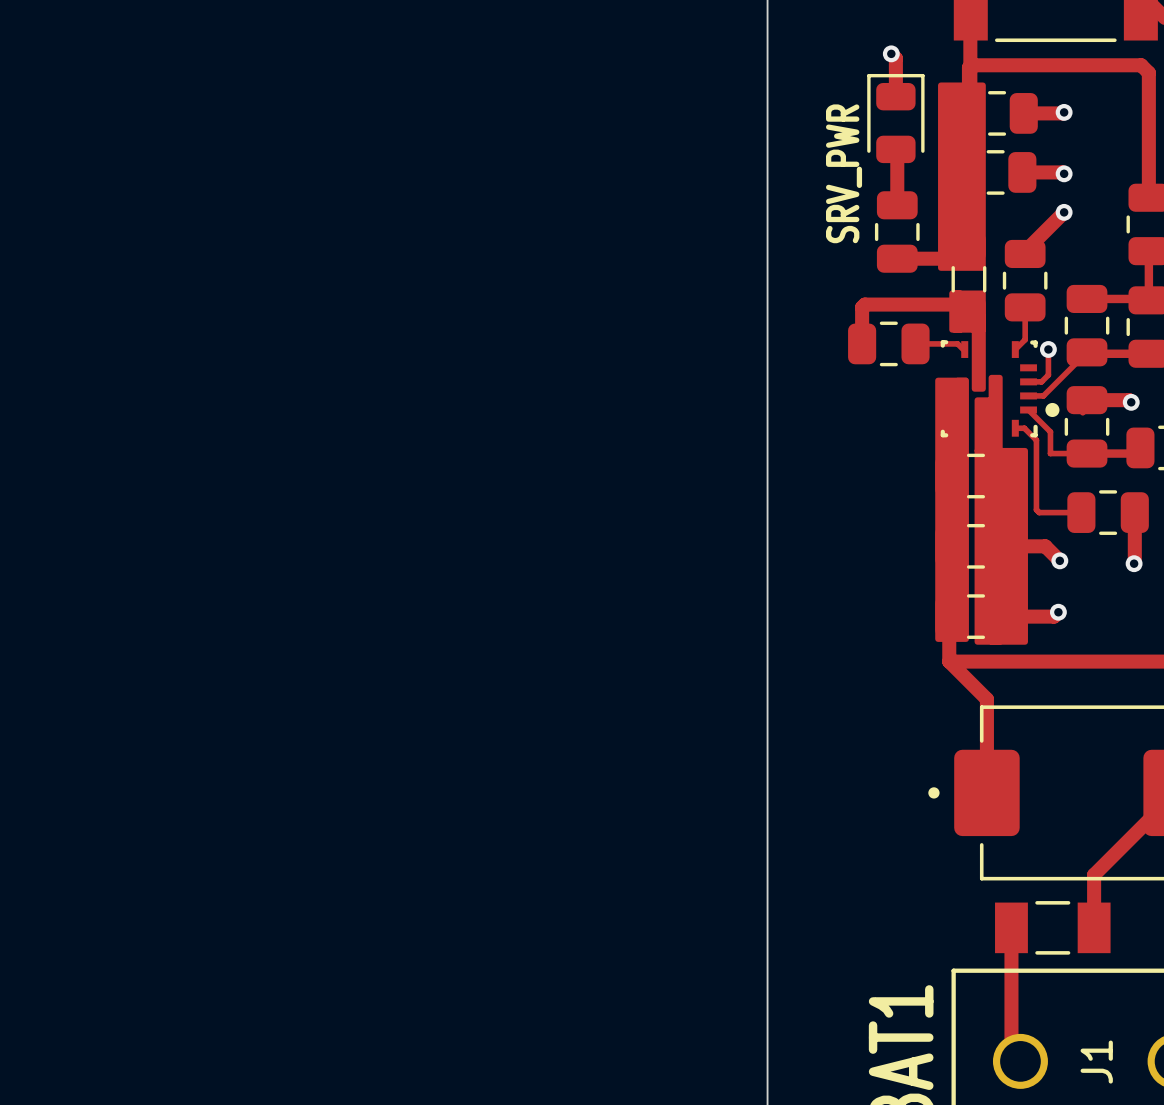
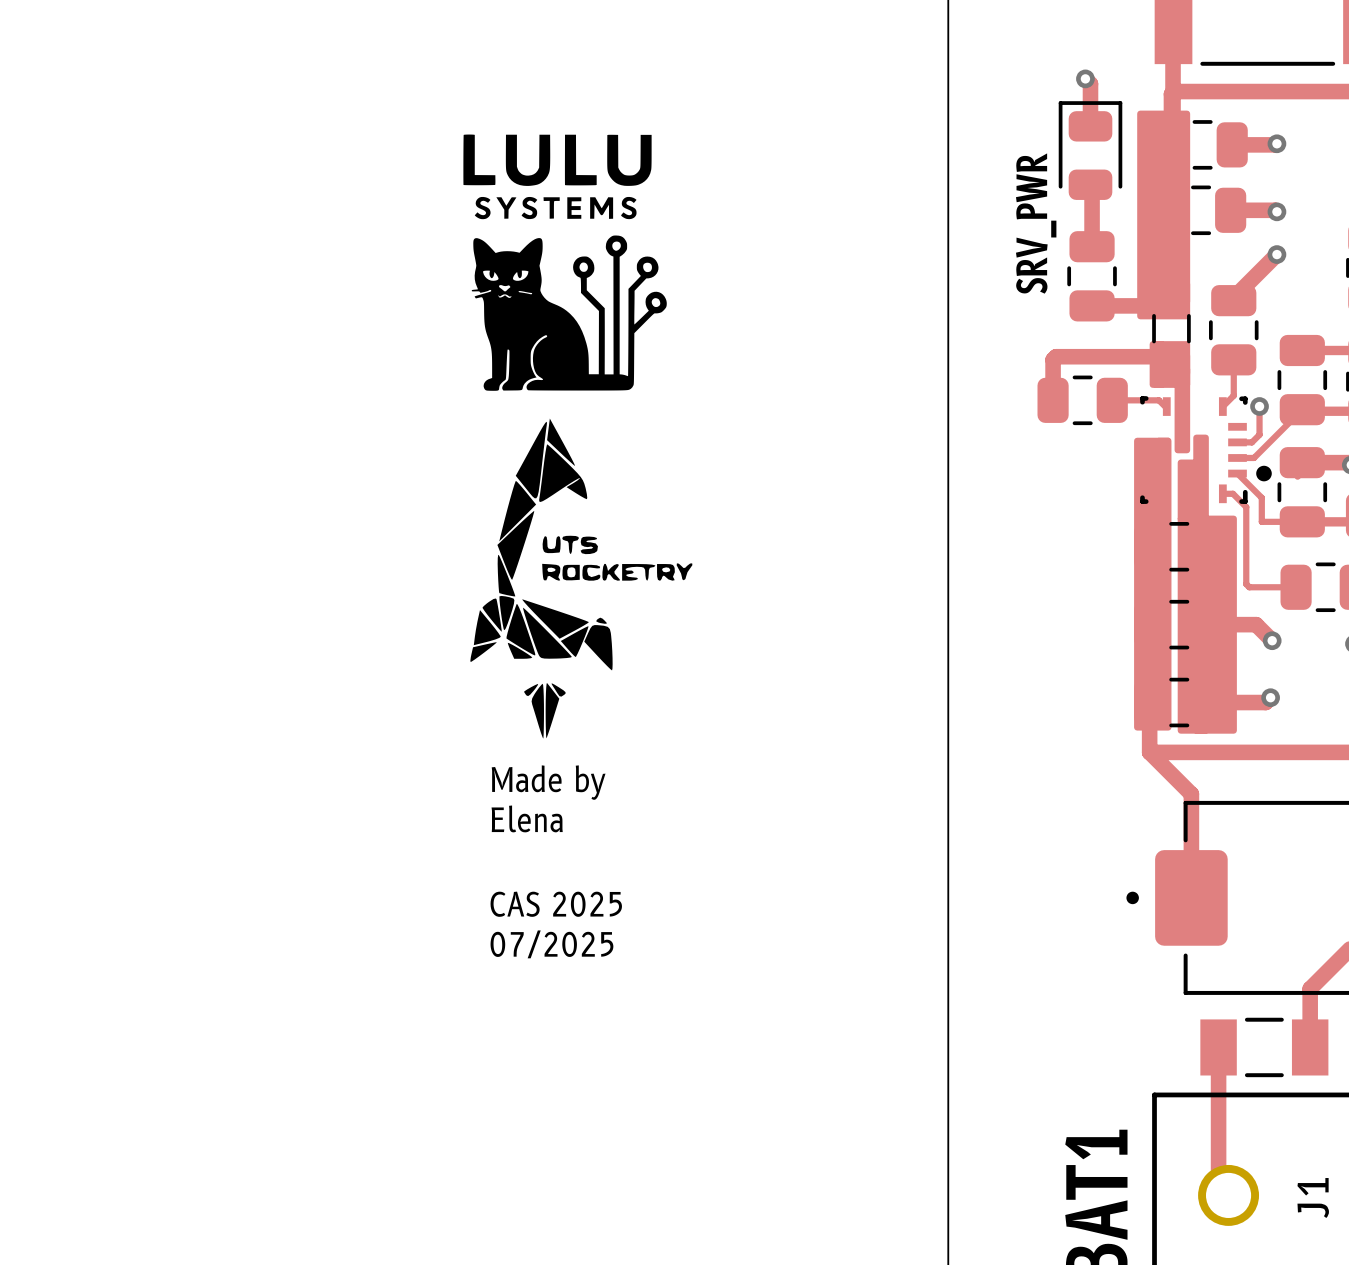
drawing: none -> [463, 134, 693, 739]
text: none -> Made by (548, 782)
text: none -> Elena (527, 818)
text: none -> CAS 2025 (556, 904)
text: none -> 07/2025 (551, 944)

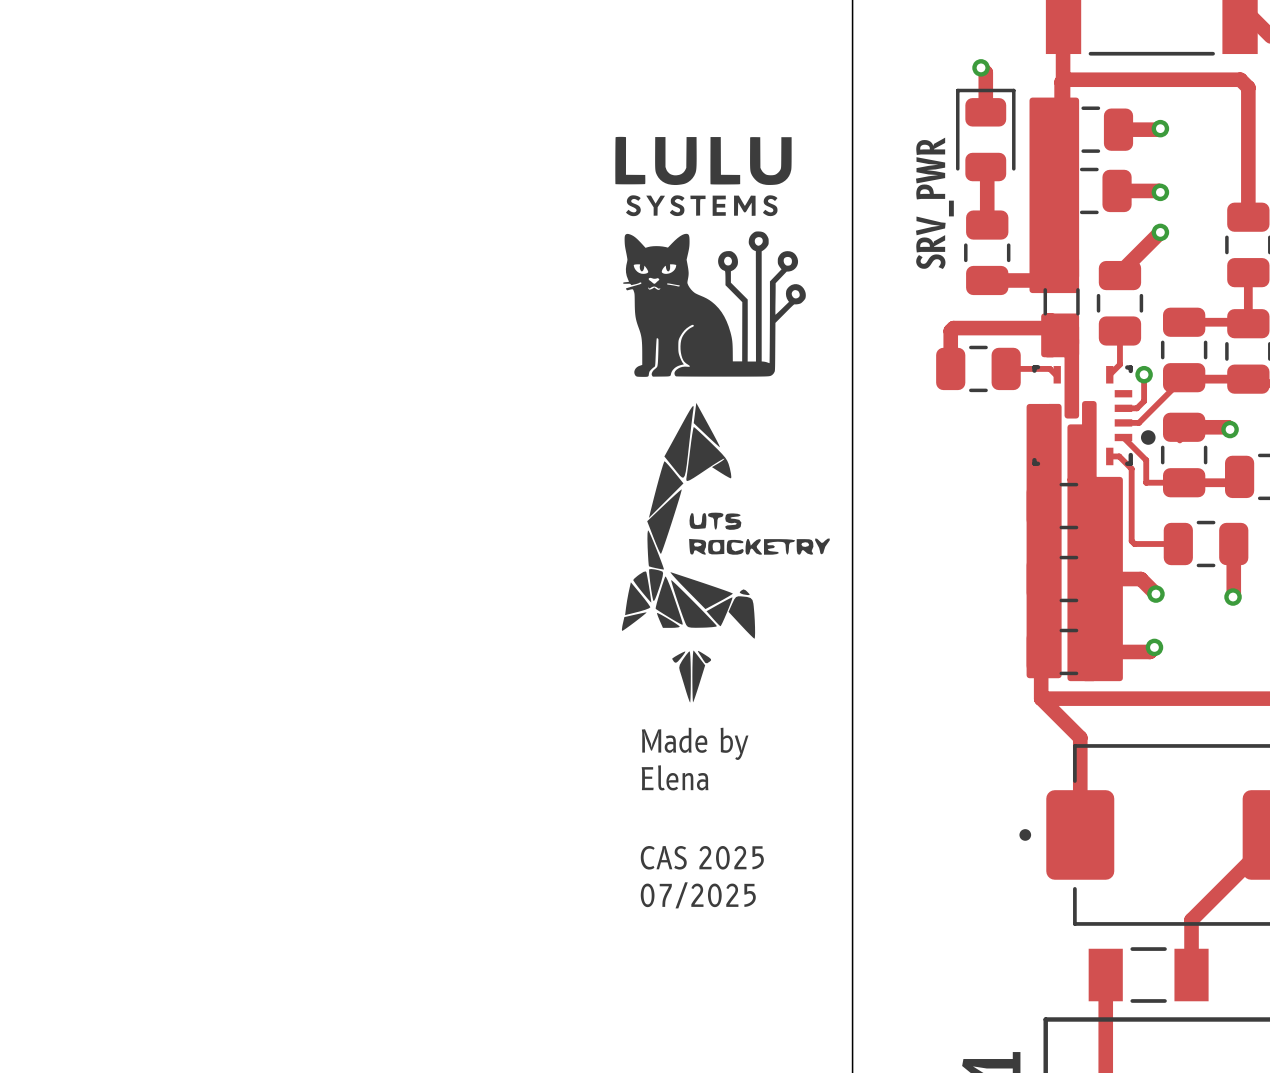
drawing position: (565, 262) -> (710, 256)
drawing position: (581, 578) -> (725, 552)
text position: Made by (548, 782) -> Made by (695, 743)
text position: Elena (527, 818) -> Elena (675, 777)
text position: CAS 2025 (556, 904) -> CAS 2025 (702, 857)
text position: 07/2025 (551, 944) -> 07/2025 (698, 895)

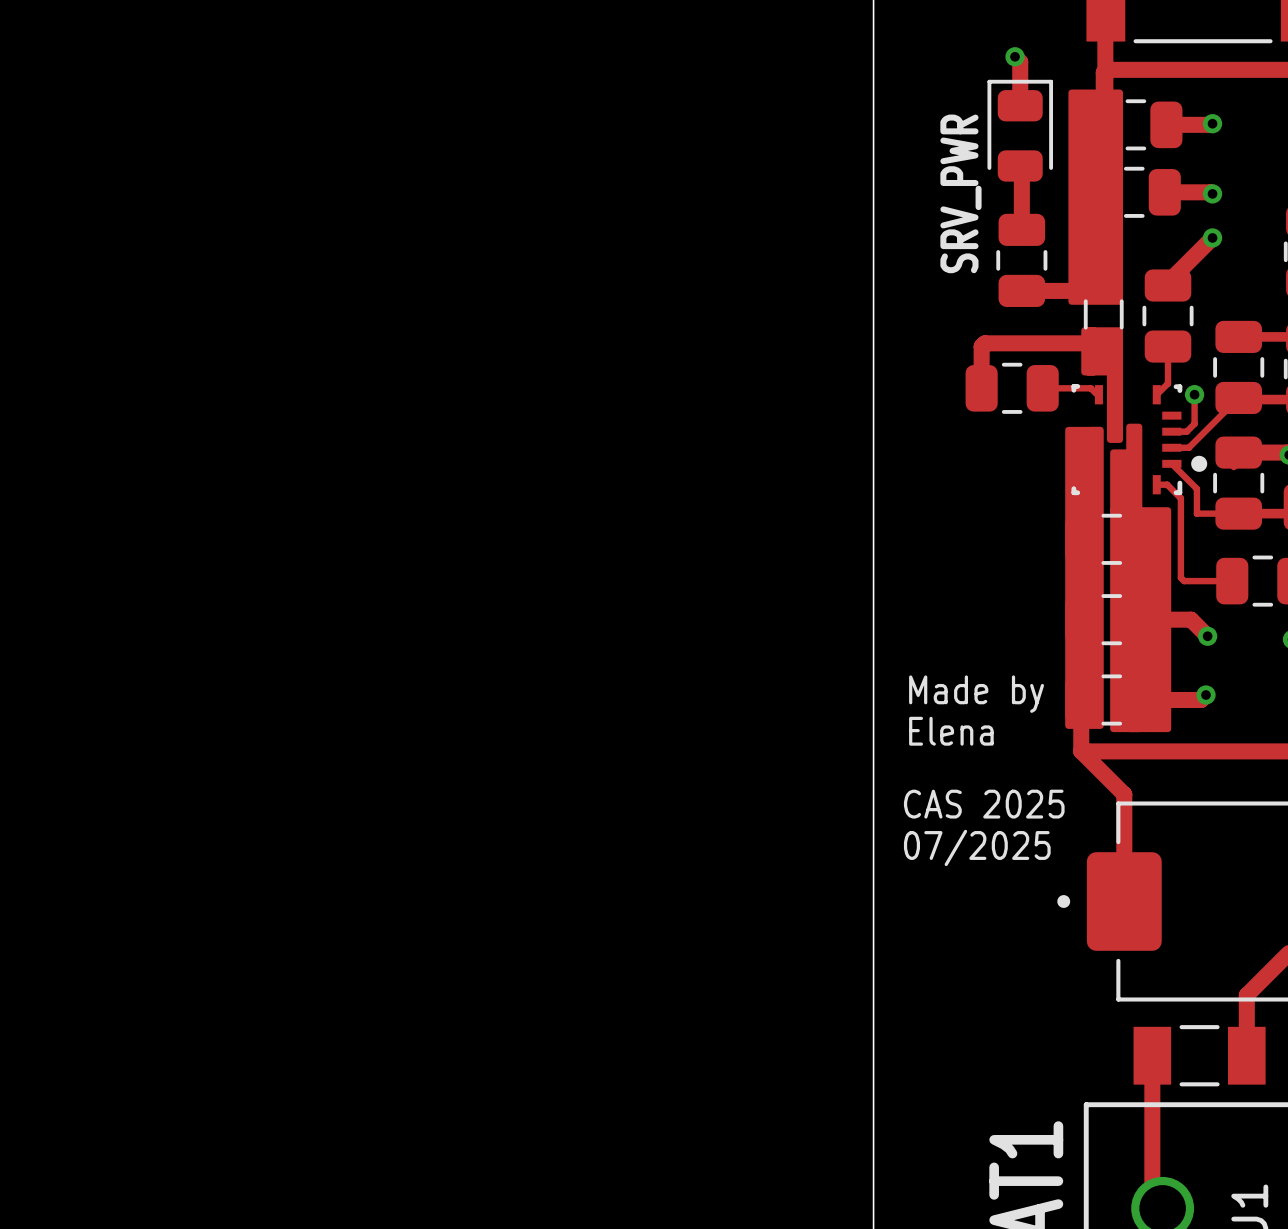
drawing: [615, 136, 830, 703] -> none
text position: Made by (695, 743) -> Made by (976, 694)
text position: Elena (675, 777) -> Elena (951, 731)
text position: CAS 2025 (702, 857) -> CAS 2025 (984, 804)
text position: 07/2025 (698, 895) -> 07/2025 (977, 847)

